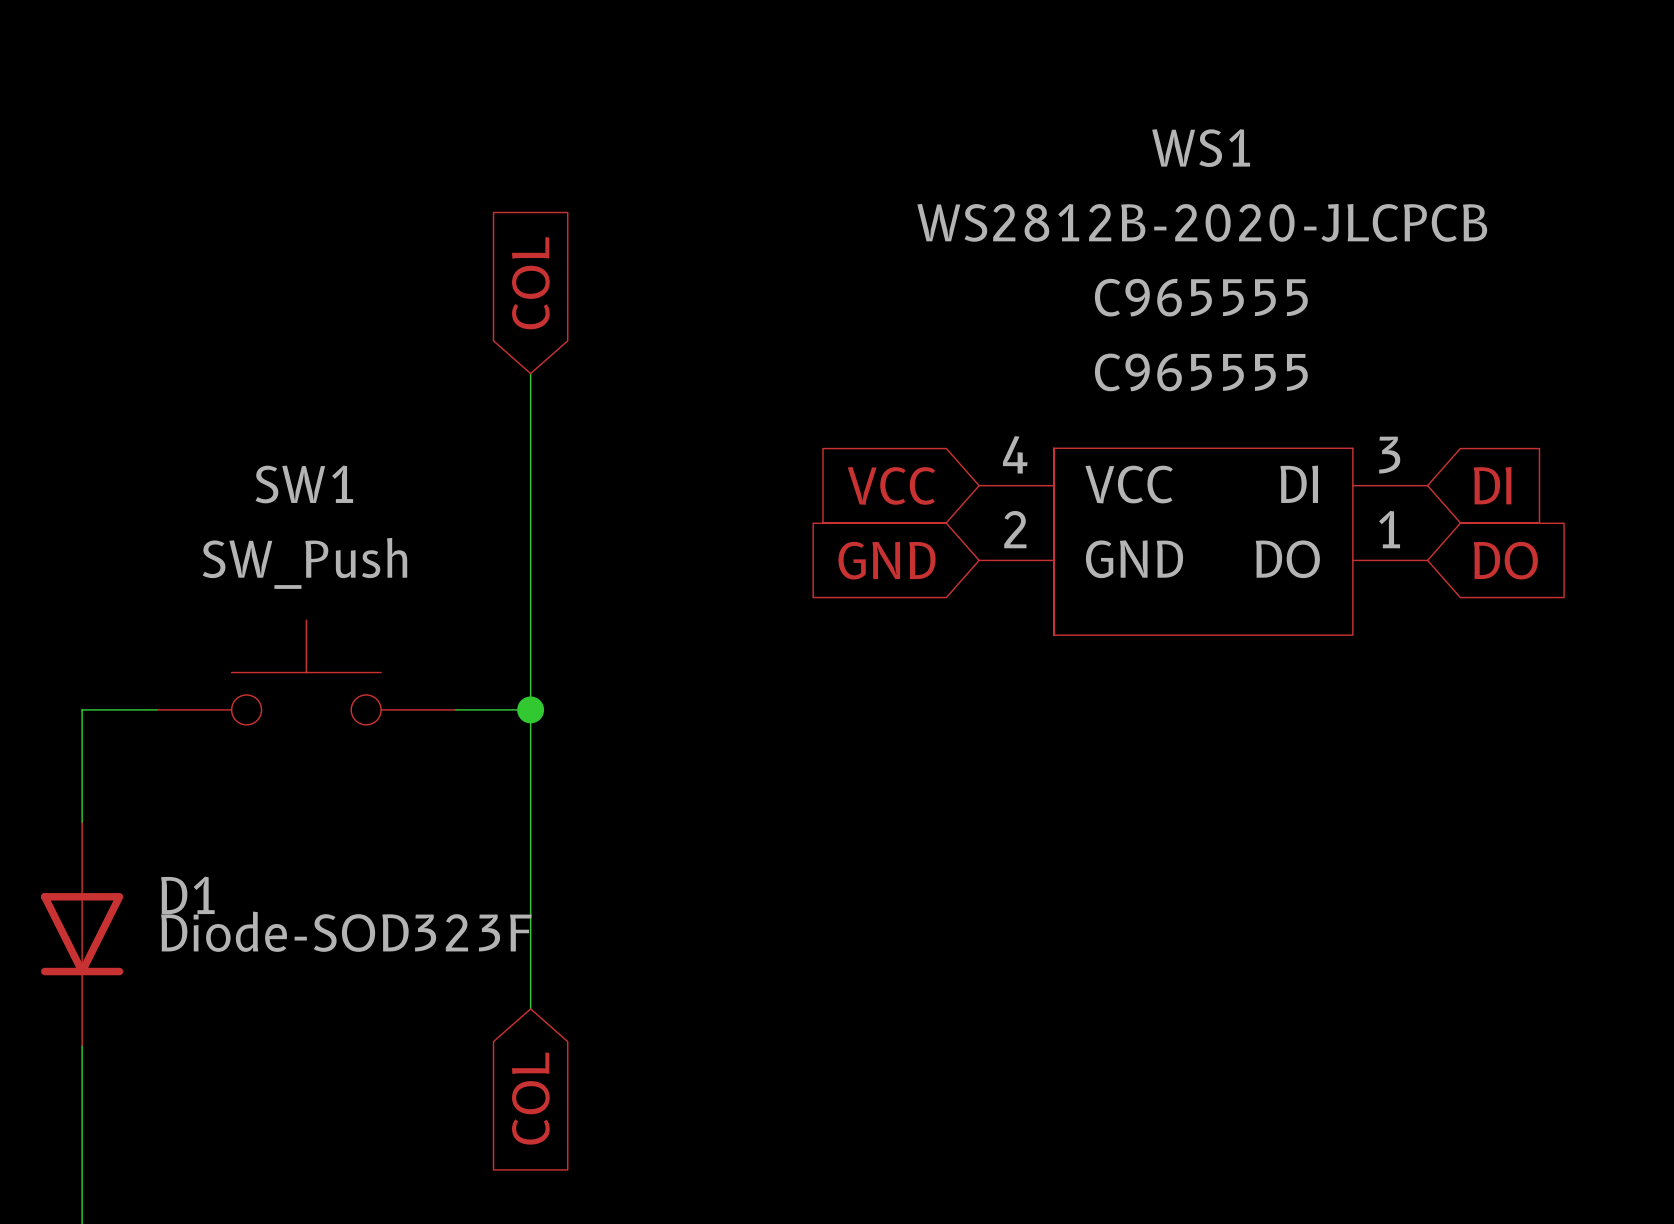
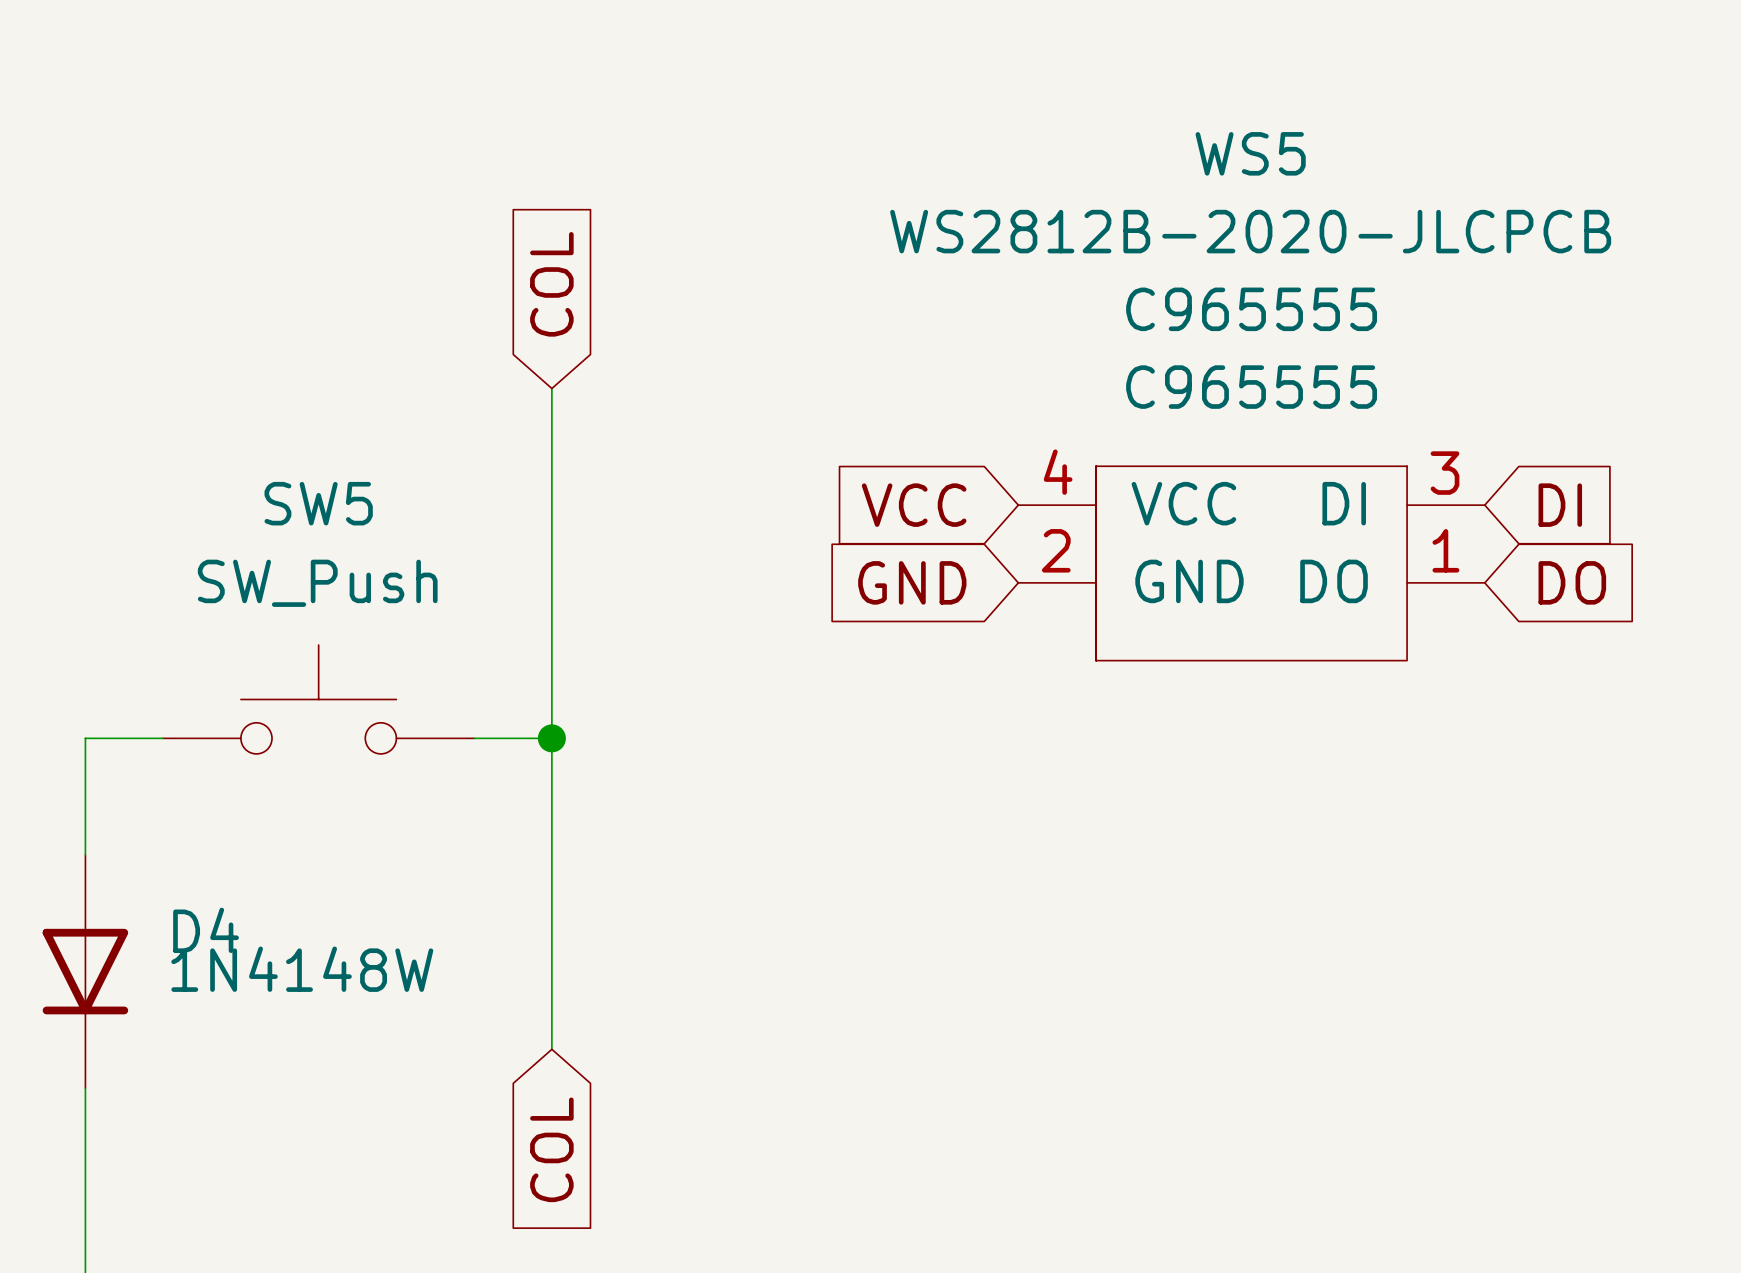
WS1 name: WS1 (1201, 148) -> WS5 (1250, 153)
SW1 name: SW1 (304, 484) -> SW5 (318, 503)
D1 name: D1 (187, 895) -> D4 (206, 930)
D1 value: Diode-SOD323F (346, 931) -> 1N4148W (302, 969)

